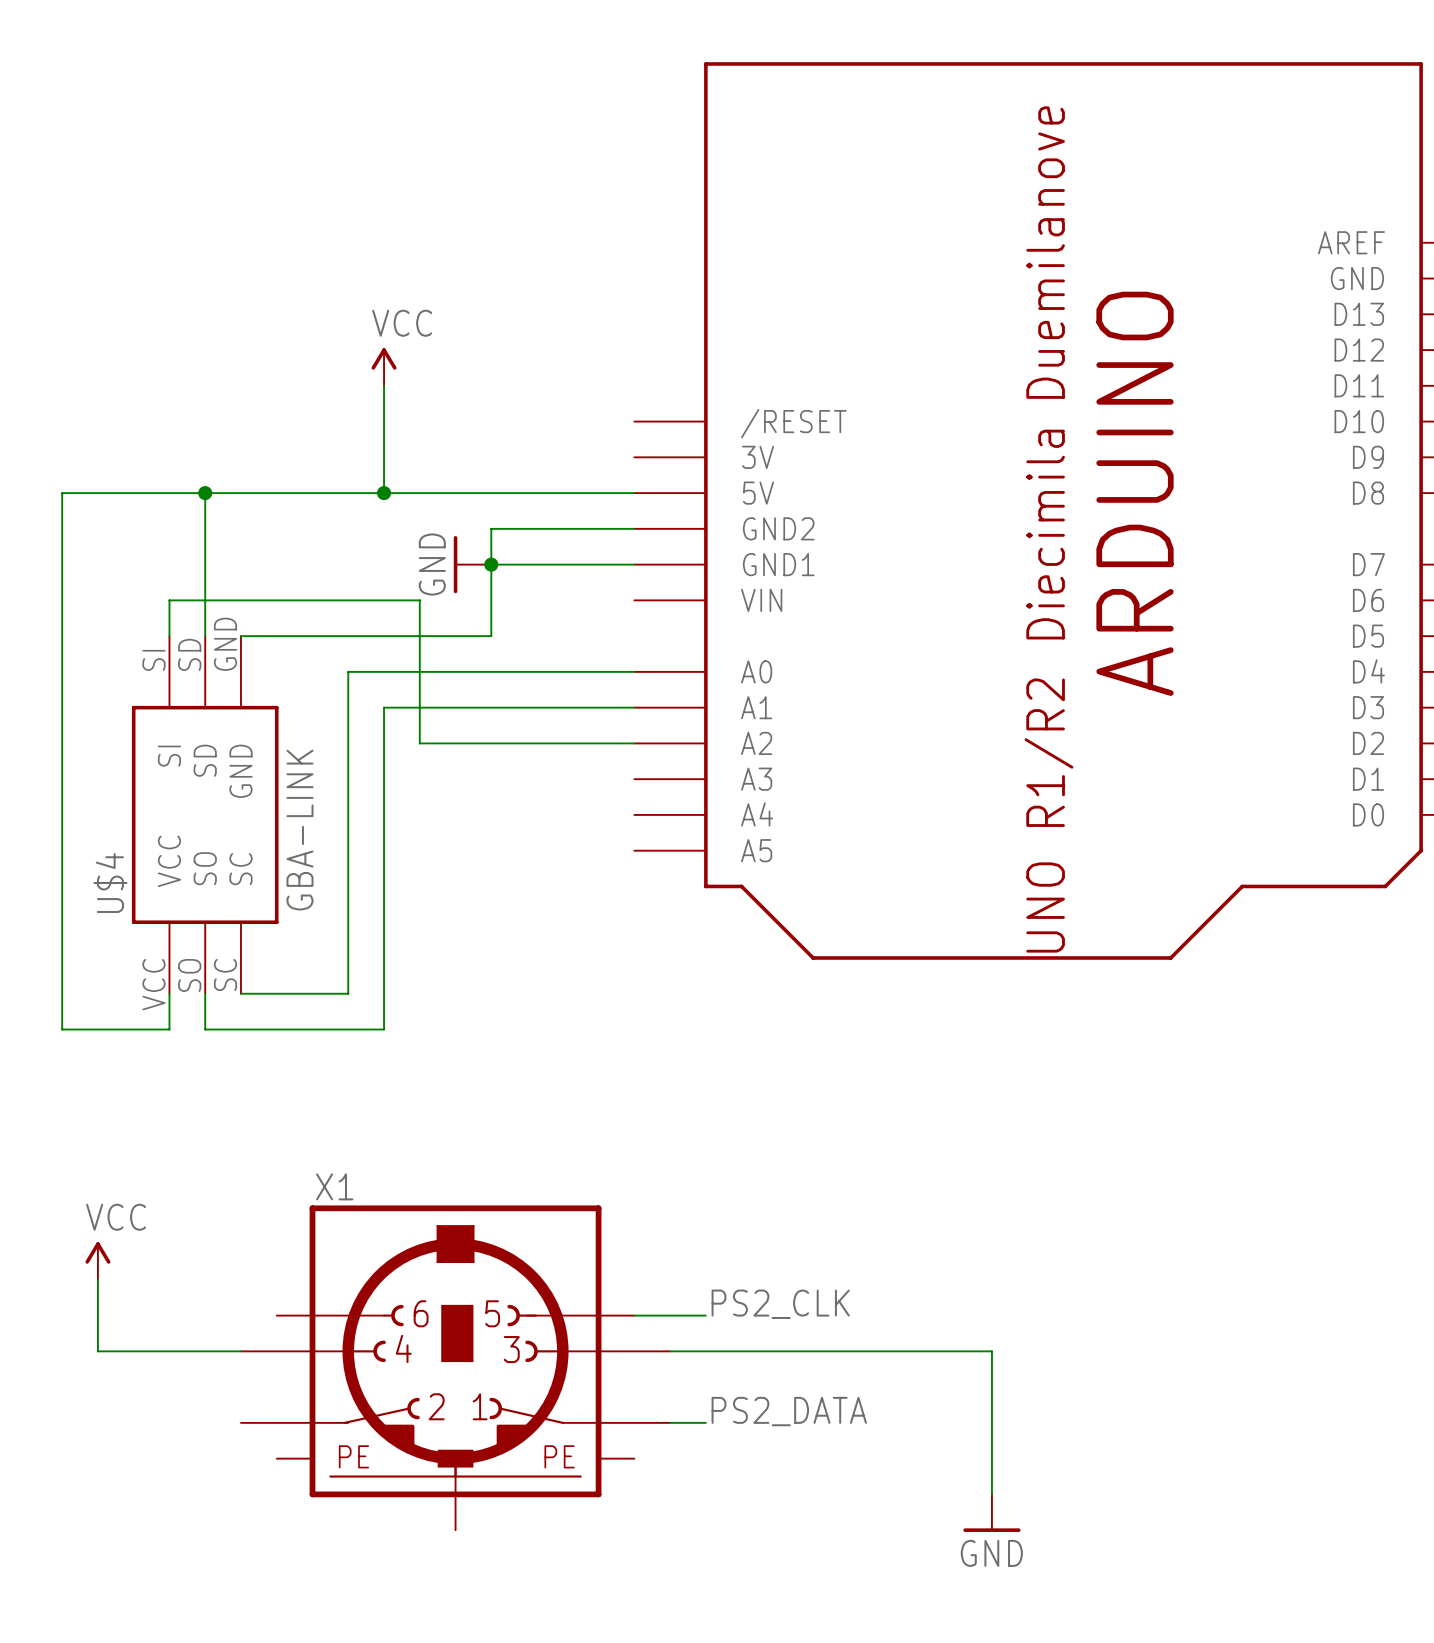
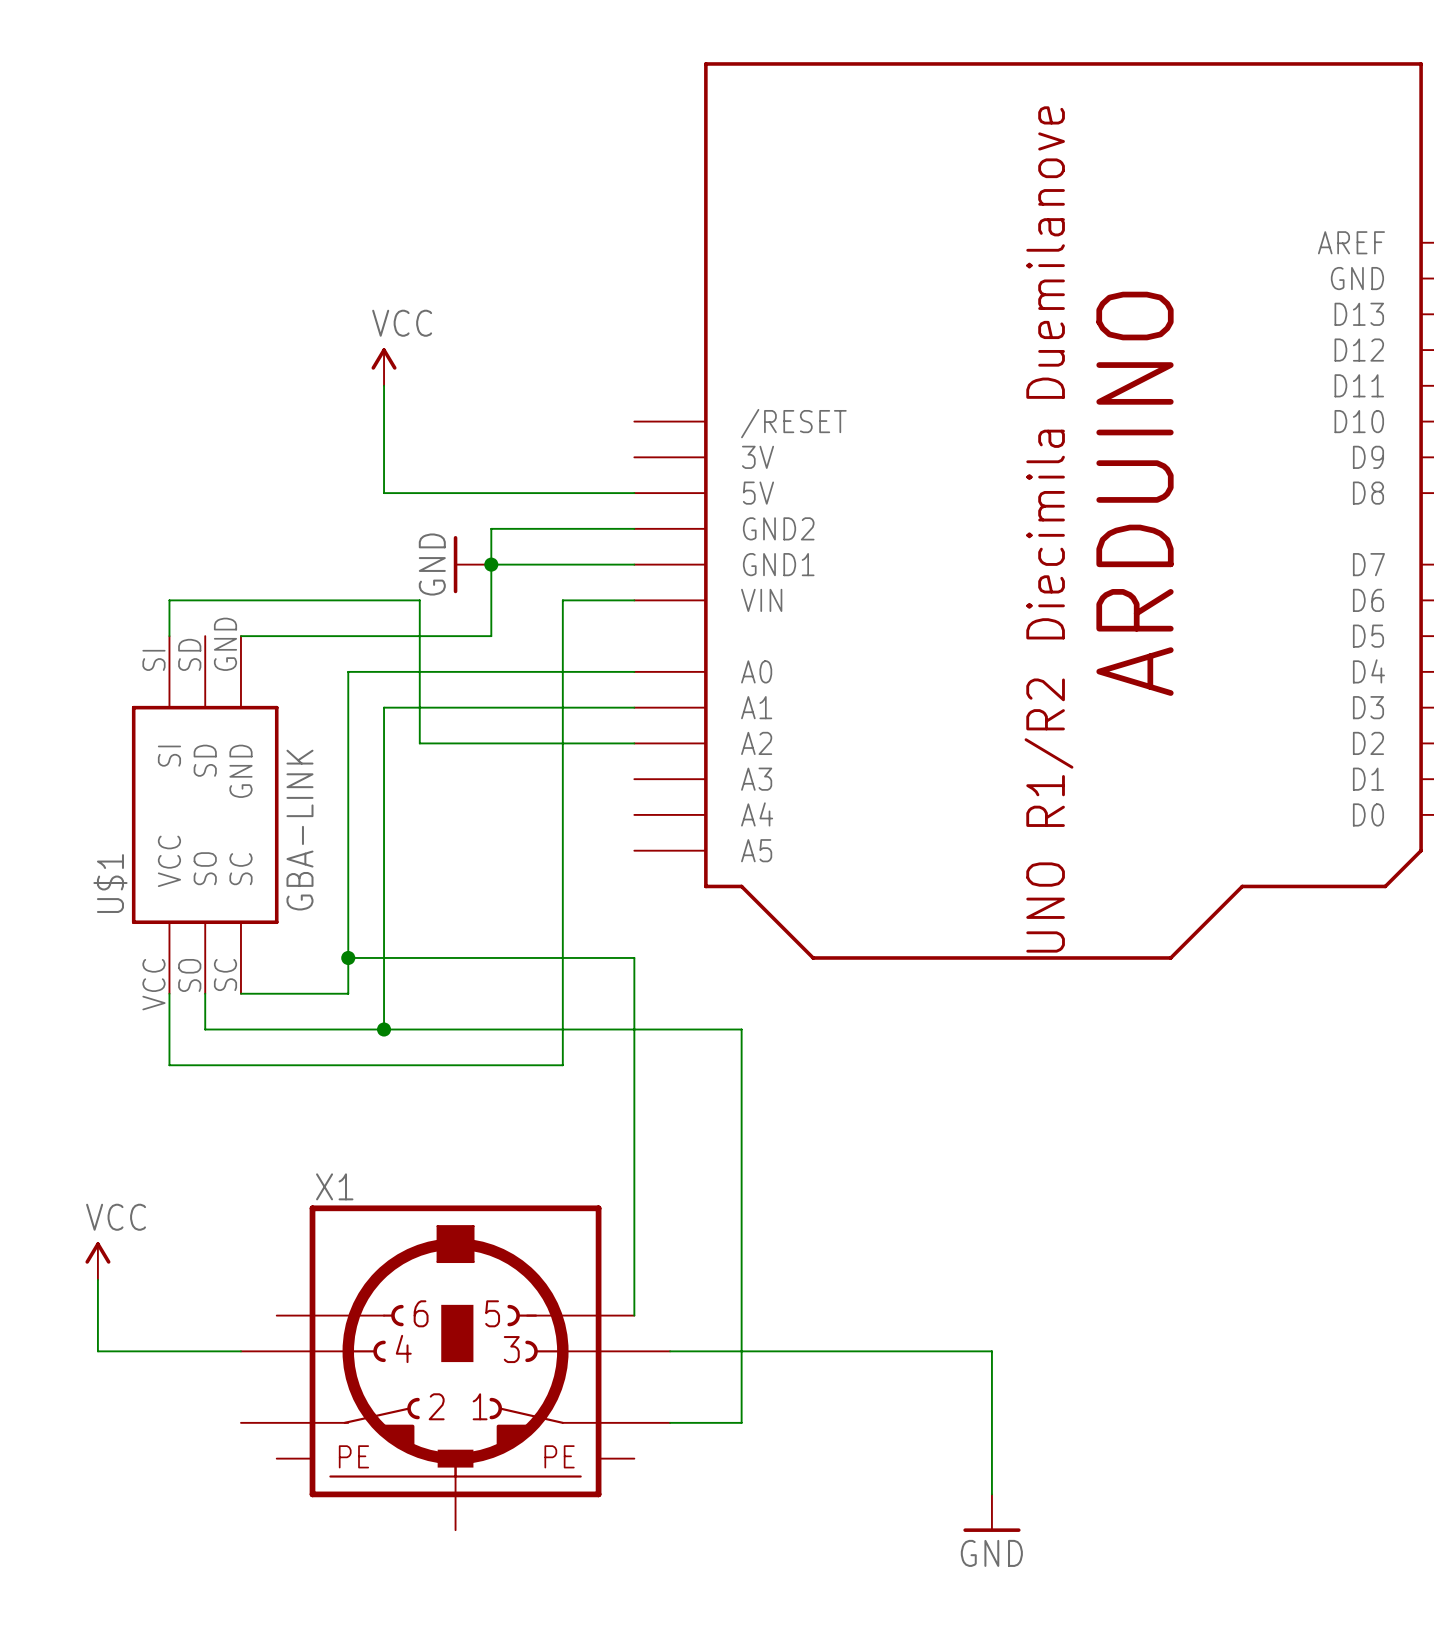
wire: (205, 493) (205, 636) -> none
junction: (205, 493) -> none
wire: (384, 493) (62, 493) (62, 1029) (169, 1029) -> (634, 600) (562, 600) (562, 1065) (169, 1065) (169, 1029)
junction: (384, 493) -> none
U$4 name: U$4 (110, 883) -> U$1 (110, 883)
junction: none -> (348, 957)
wire: none -> (384, 1029) (741, 1029) (741, 1422) (705, 1422)
junction: none -> (384, 1029)
label: PS2_CLK (780, 1304) -> none
wire: (634, 1315) (705, 1315) -> (634, 1315) (634, 957) (348, 957)
label: PS2_DATA (789, 1411) -> none

